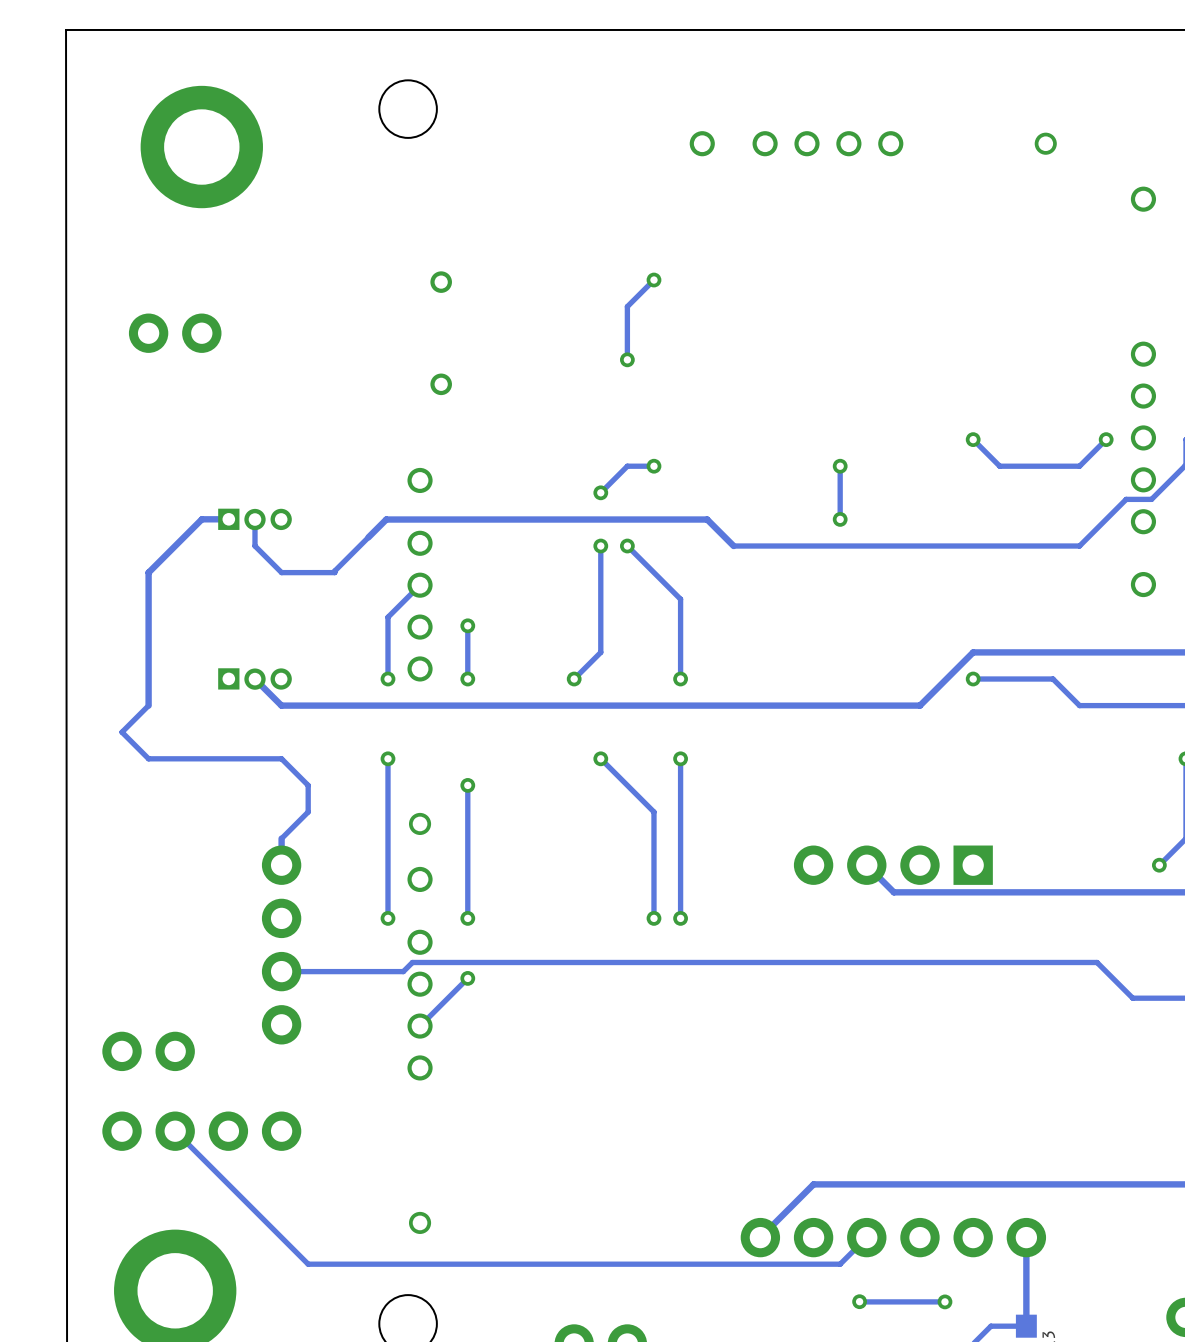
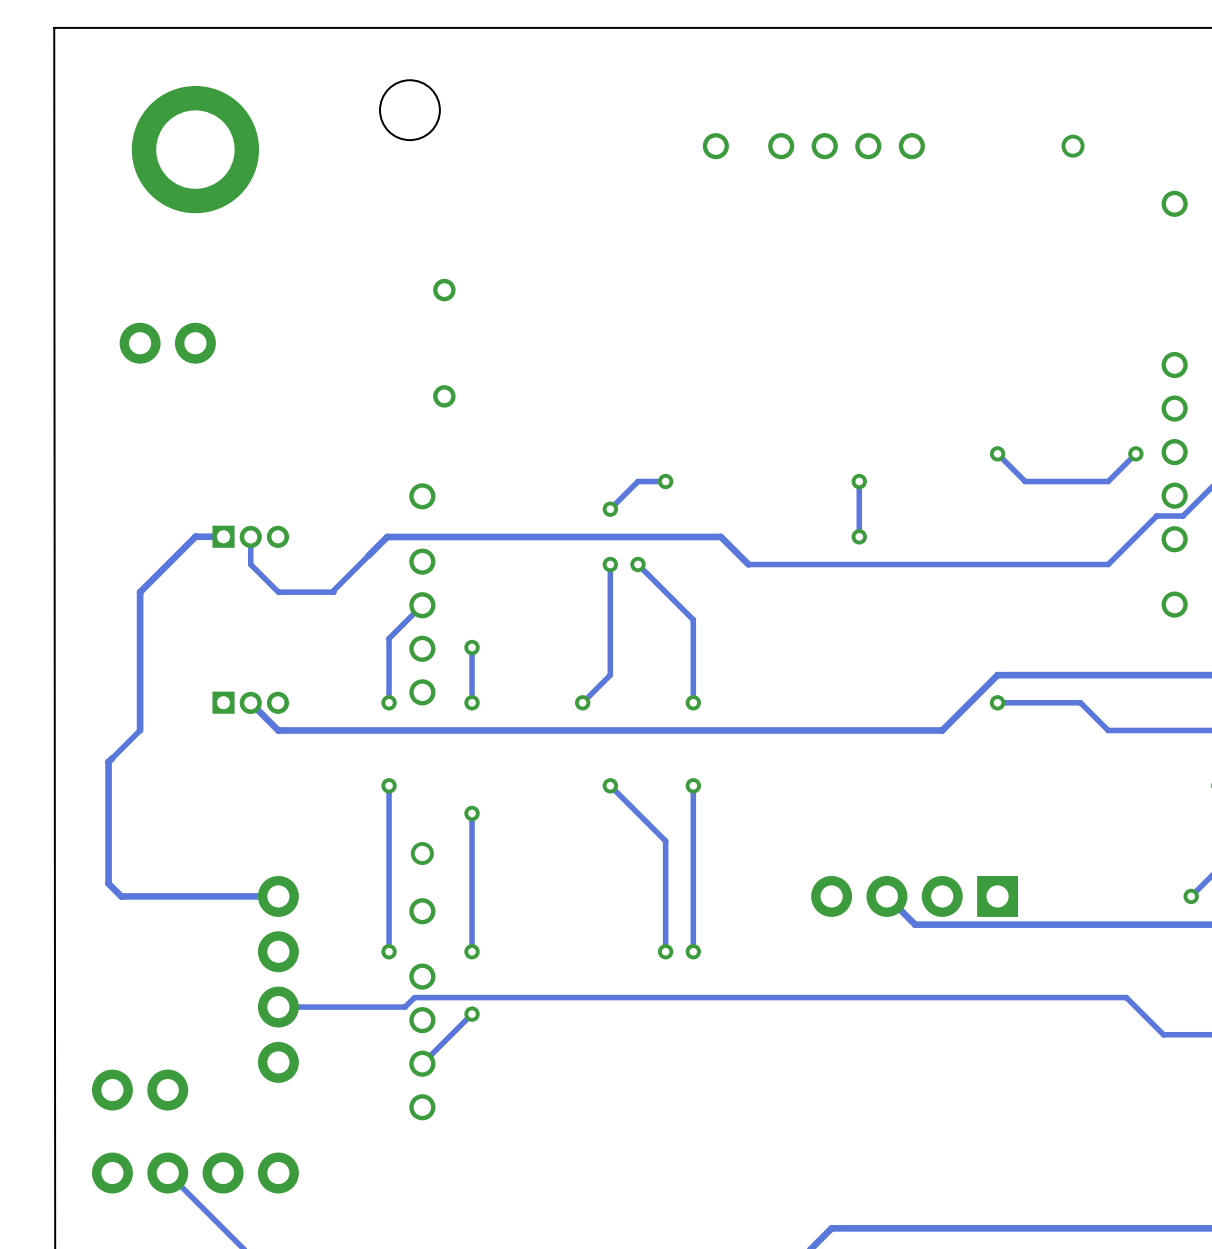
track: (653, 280) (627, 306) (627, 359) -> none
via: (653, 280) -> none
via: (627, 359) -> none
track: (122, 732) (148, 758) (281, 758) (308, 785) (308, 812) (281, 838) (281, 865) -> (112, 758) (108, 762) (108, 883) (121, 896) (278, 896)

